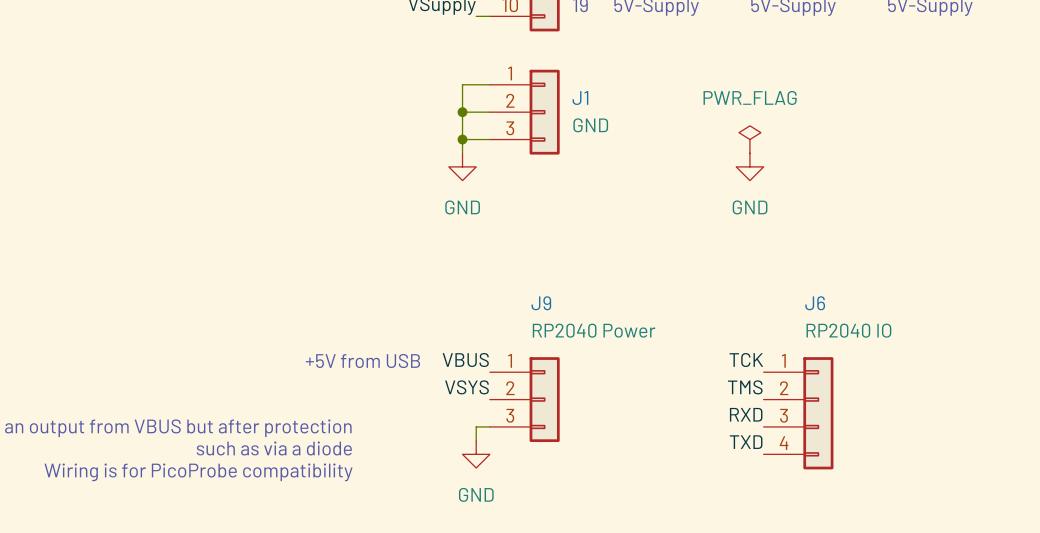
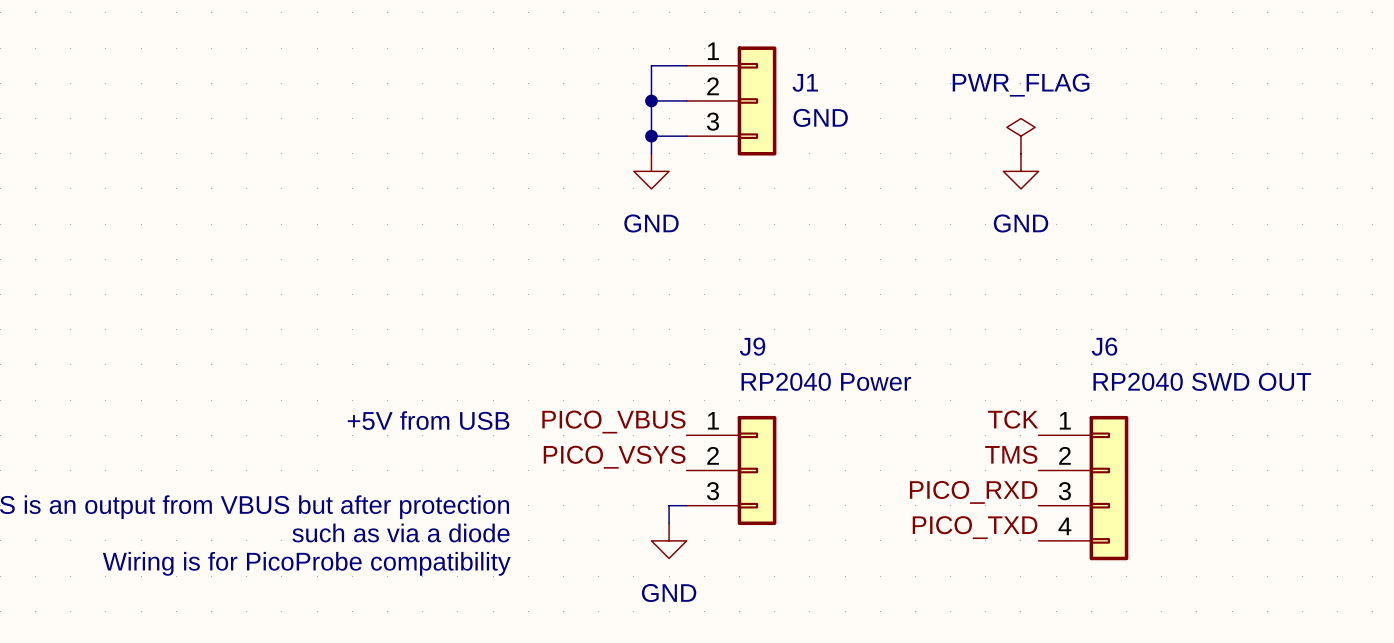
J6 value: RP2040 IO (848, 330) -> RP2040 SWD OUT (1202, 381)
label: VBUS (465, 360) -> PICO_VBUS (613, 422)
text position: +5V from USB (362, 361) -> +5V from USB (428, 420)
label: VSYS (466, 387) -> PICO_VSYS (614, 457)
label: RXD (746, 414) -> PICO_RXD (973, 492)
label: TXD (746, 442) -> PICO_TXD (975, 527)

